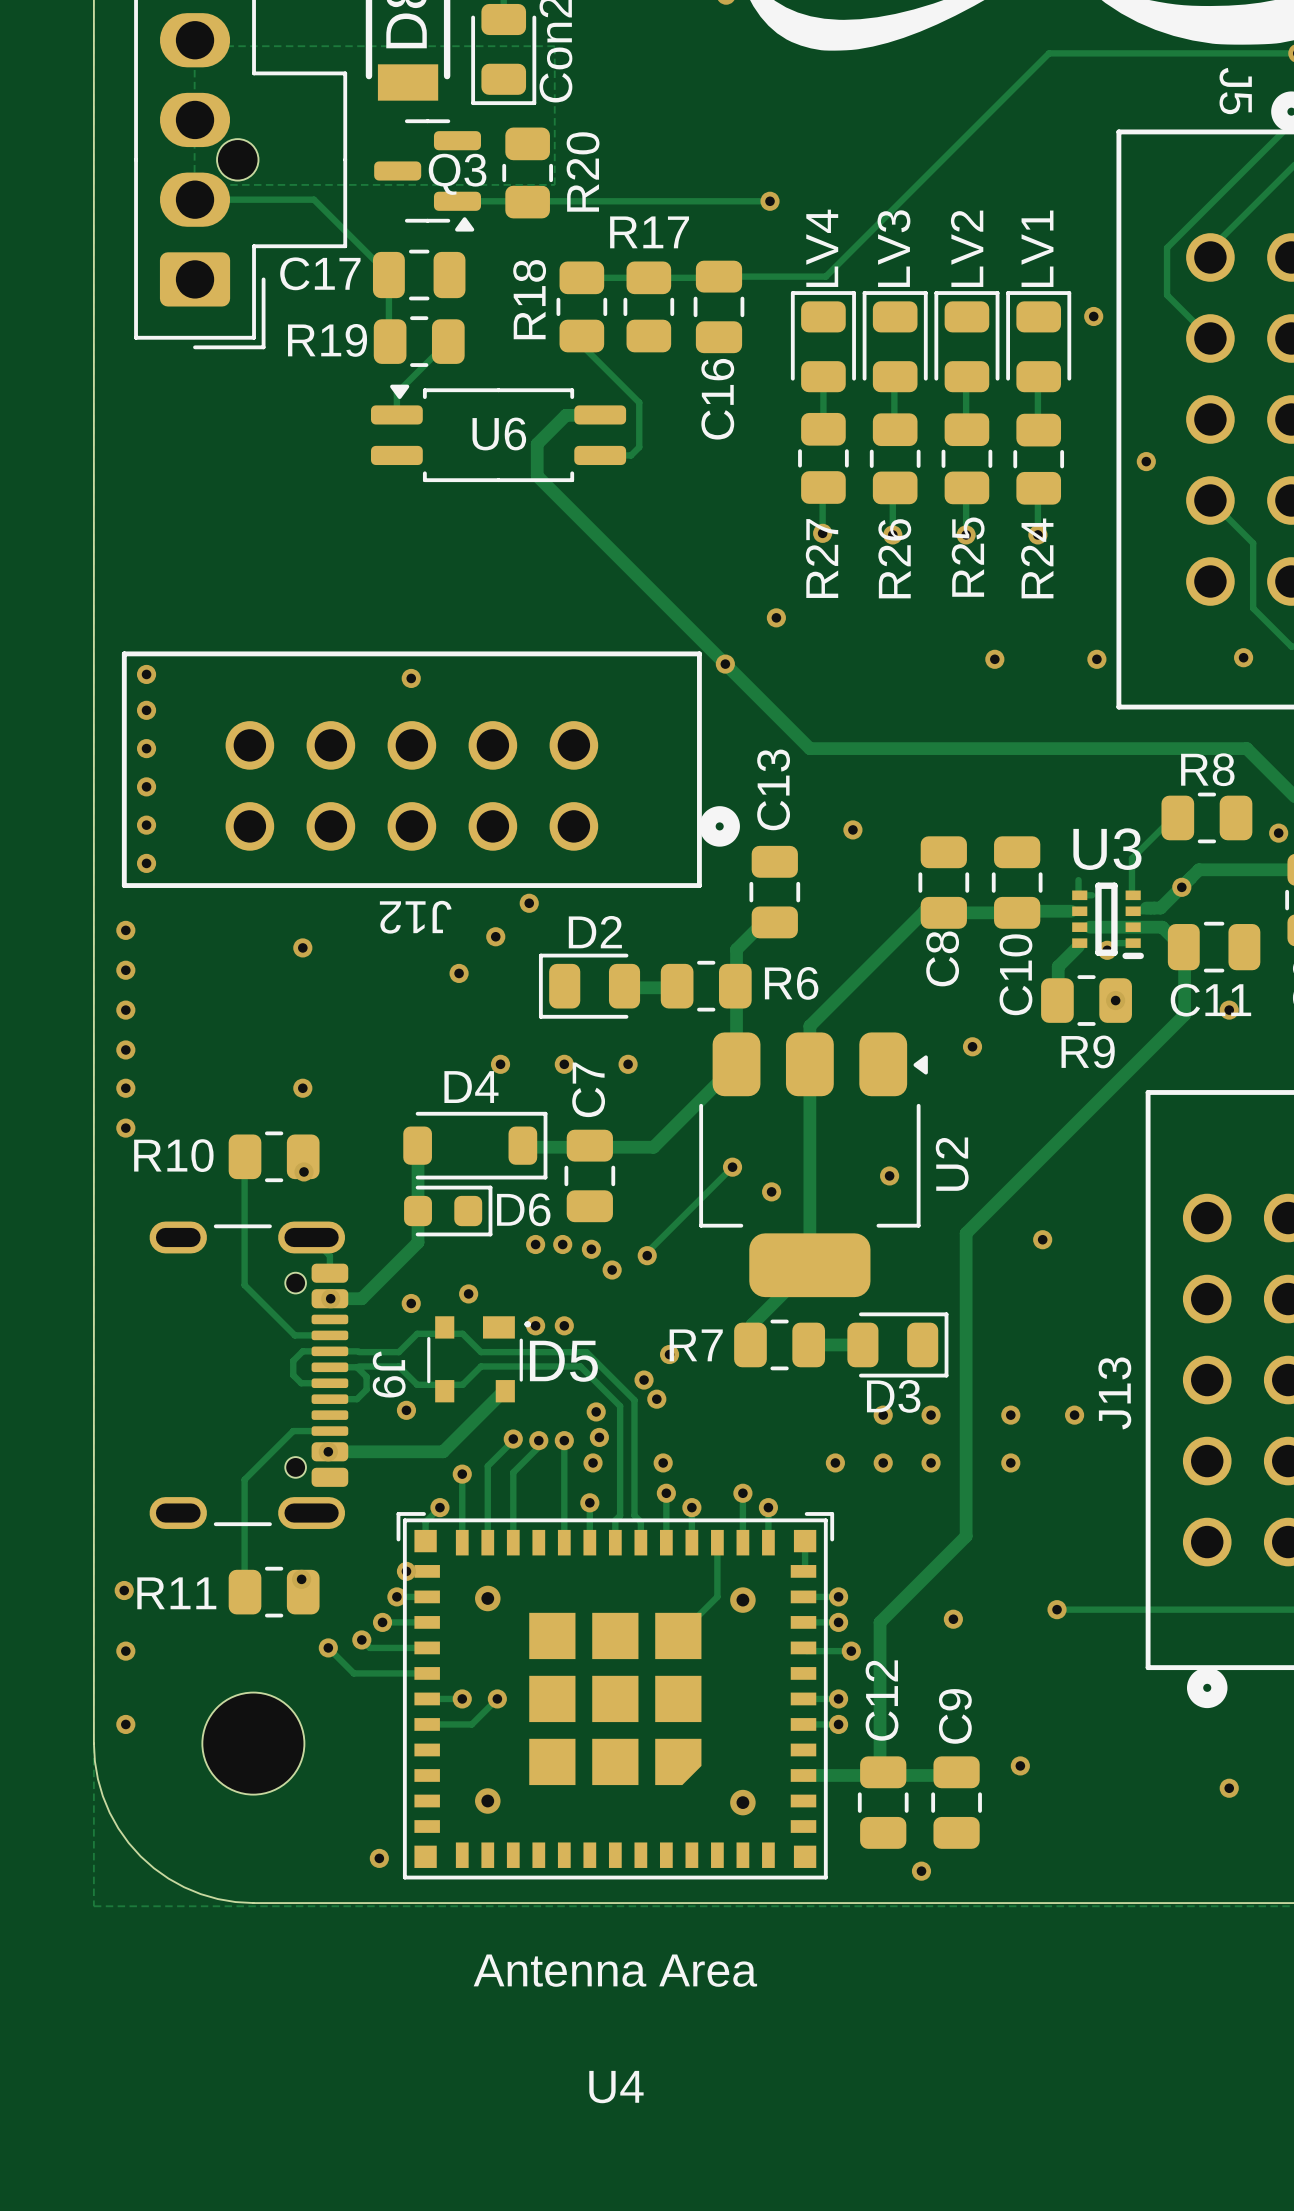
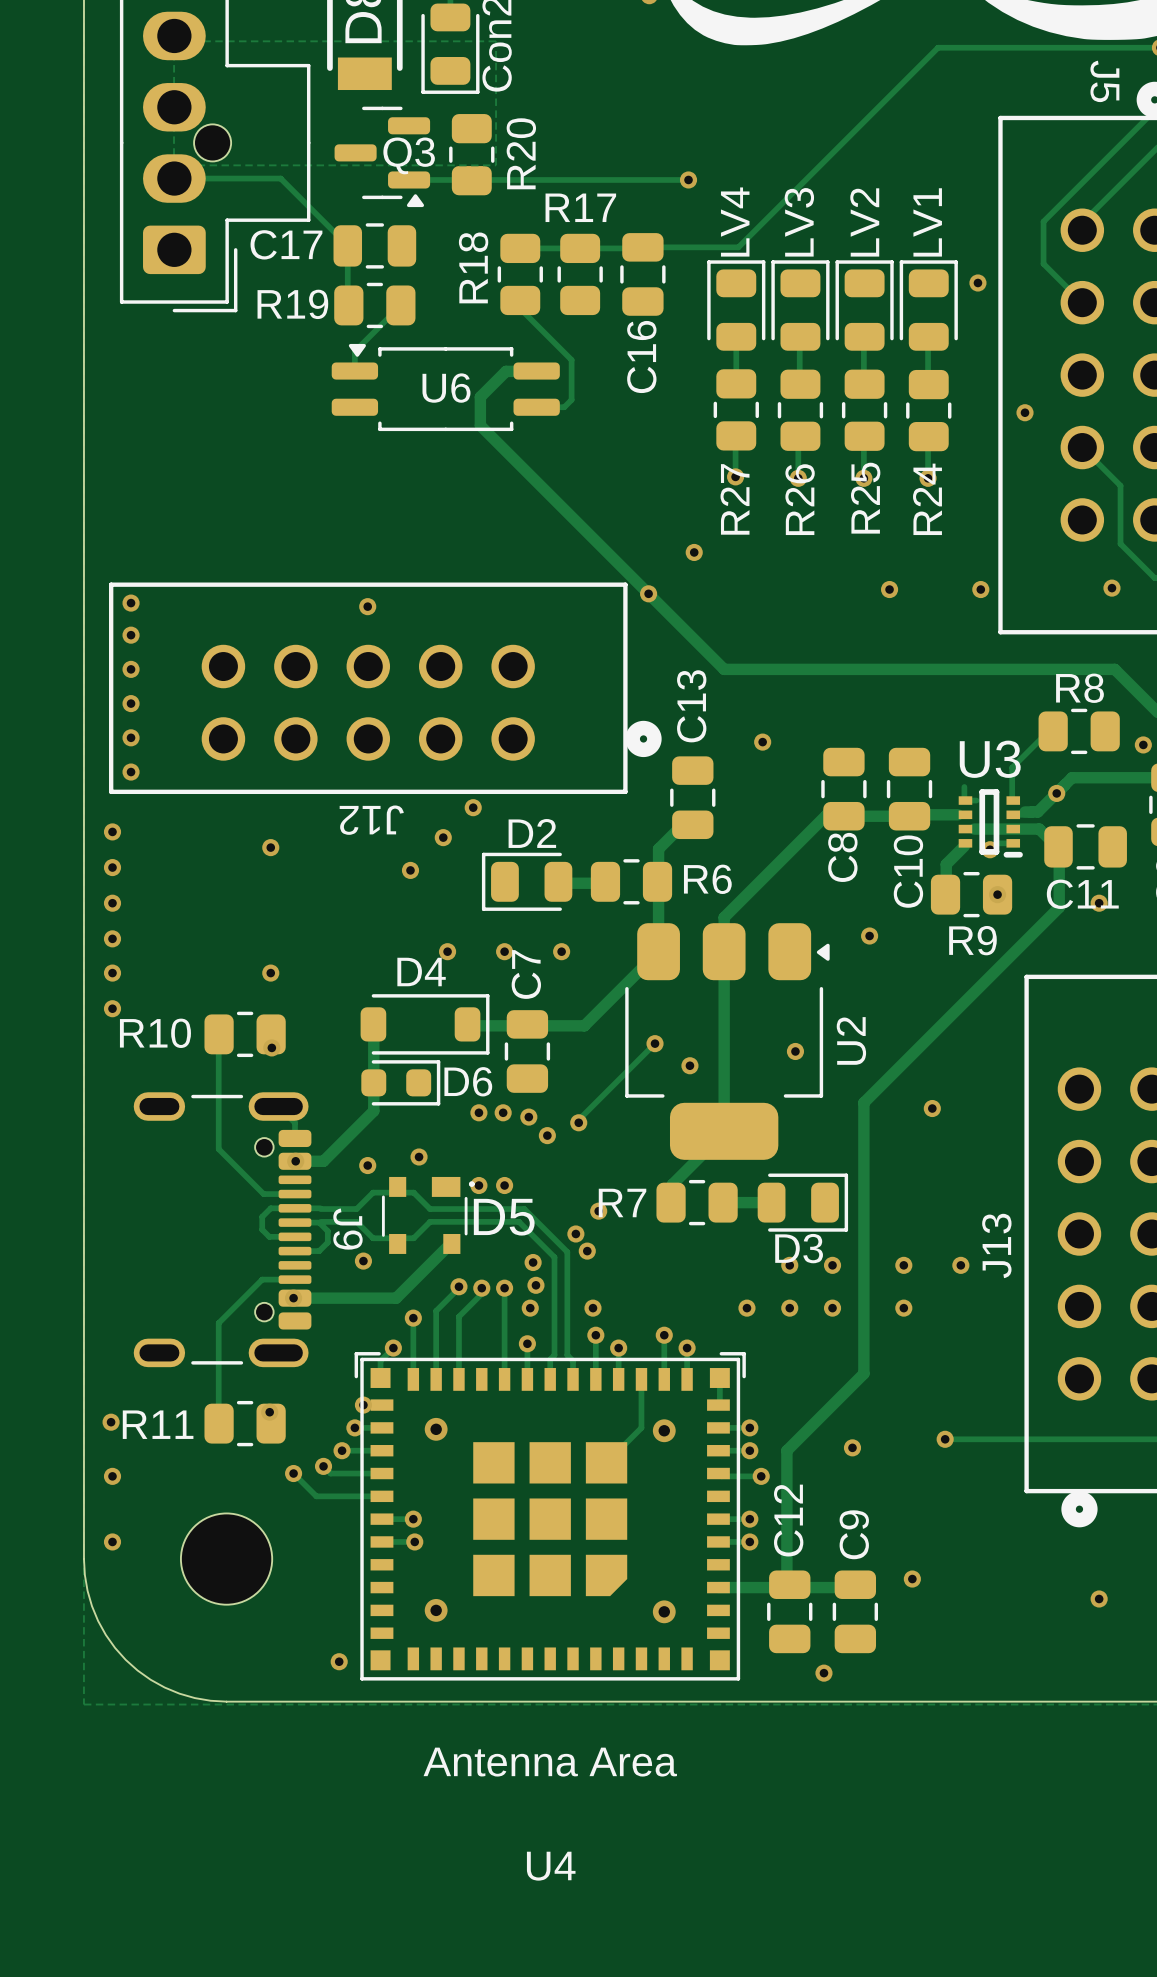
track: (497, 1698) (471, 1724) (463, 1724) -> none
via position: (497, 1698) -> (414, 1541)

